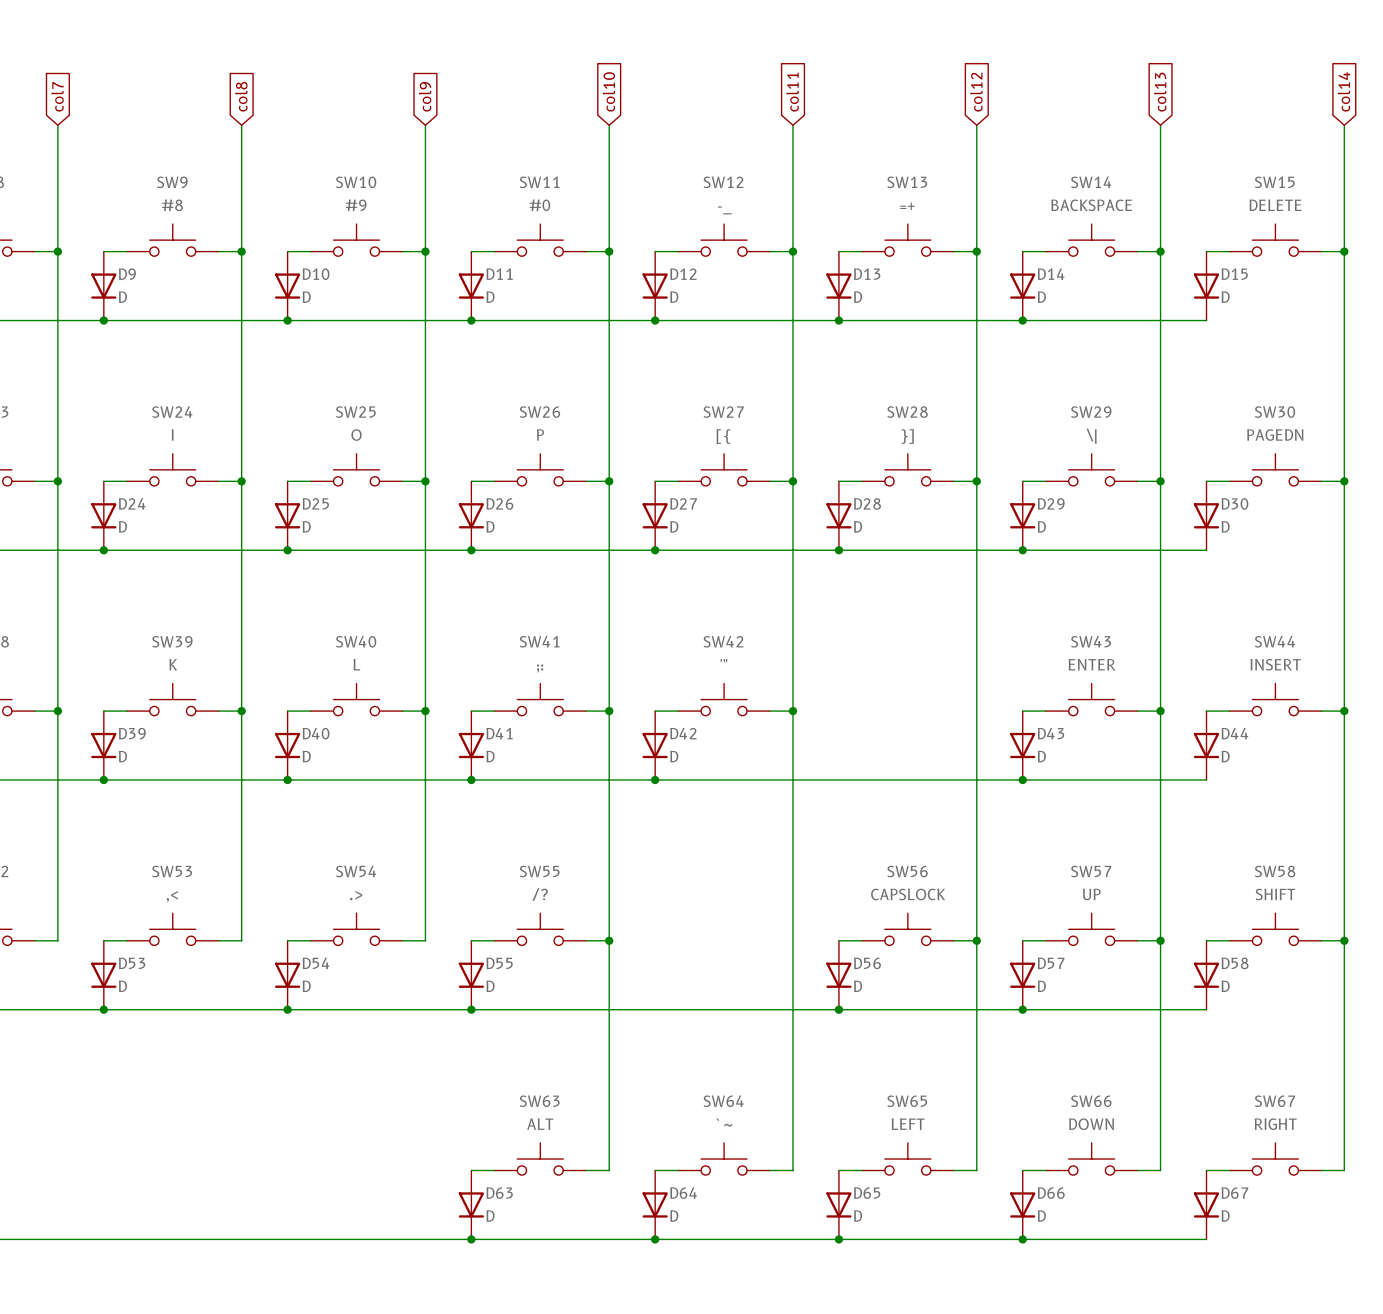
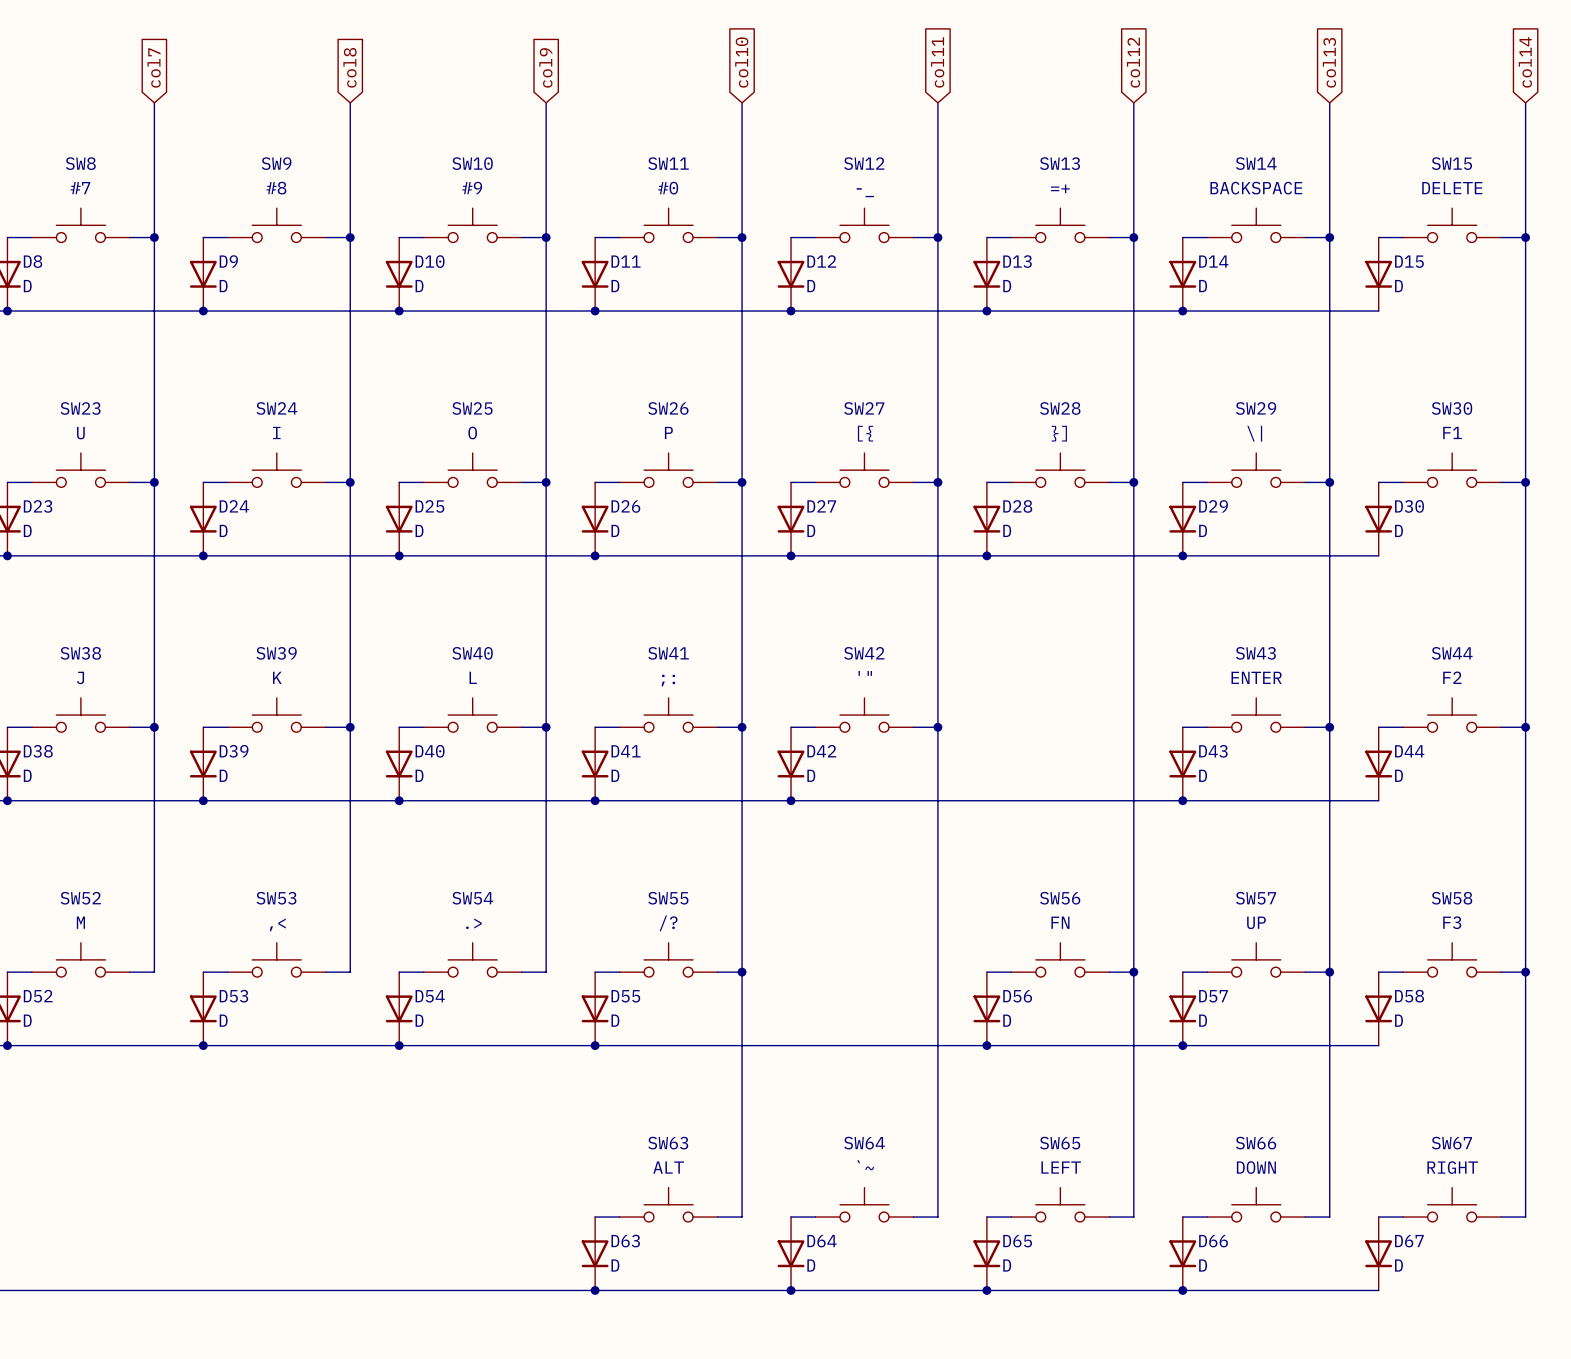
SW30 value: PAGEDN (1275, 435) -> F1 (1452, 432)
SW44 value: INSERT (1275, 664) -> F2 (1452, 677)
SW56 value: CAPSLOCK (908, 894) -> FN (1060, 922)
SW58 value: SHIFT (1275, 894) -> F3 (1452, 922)

